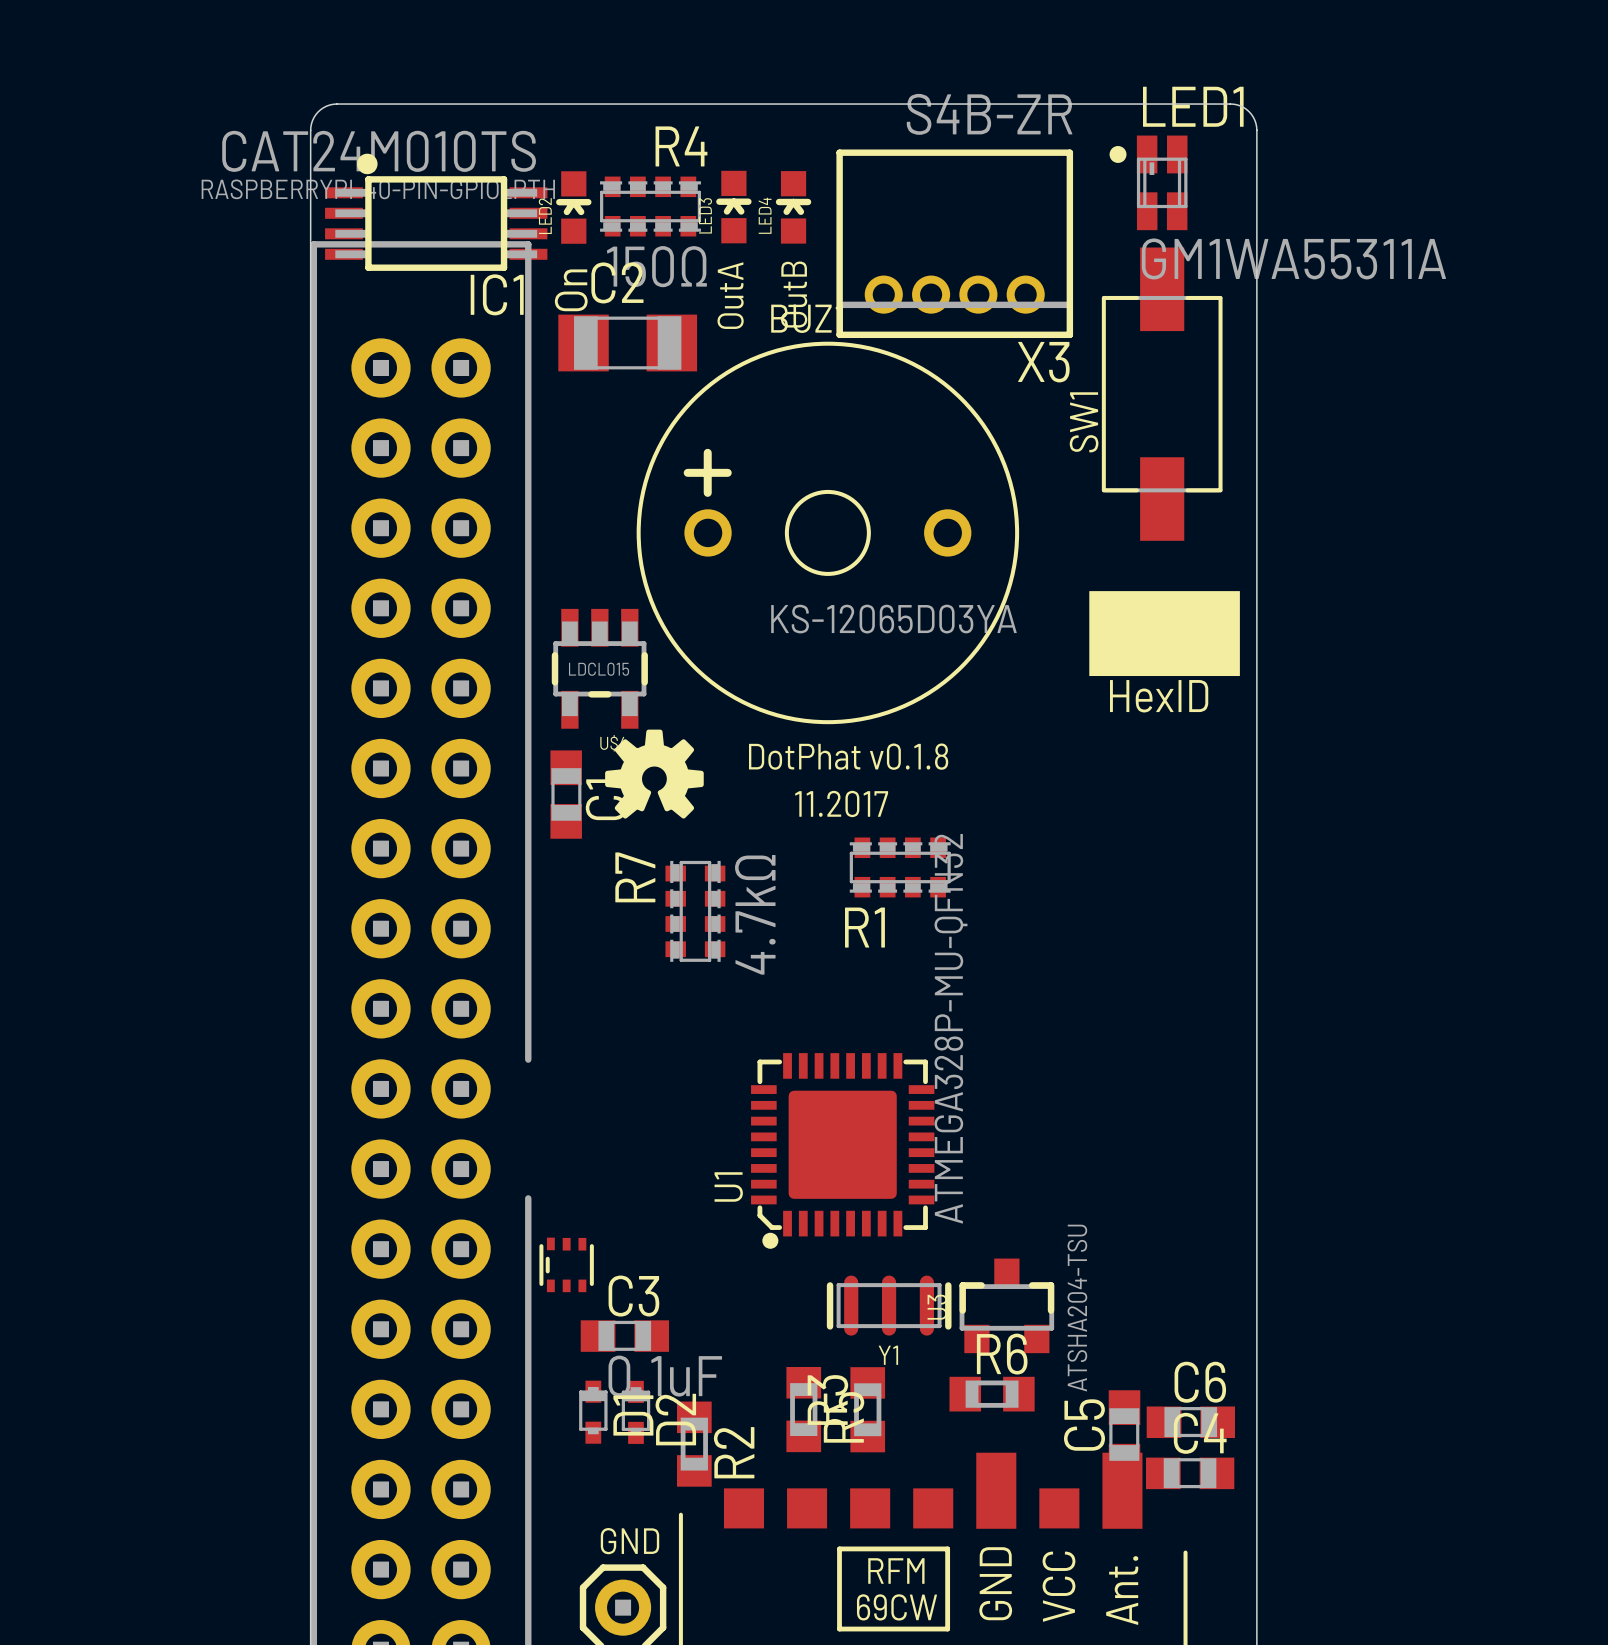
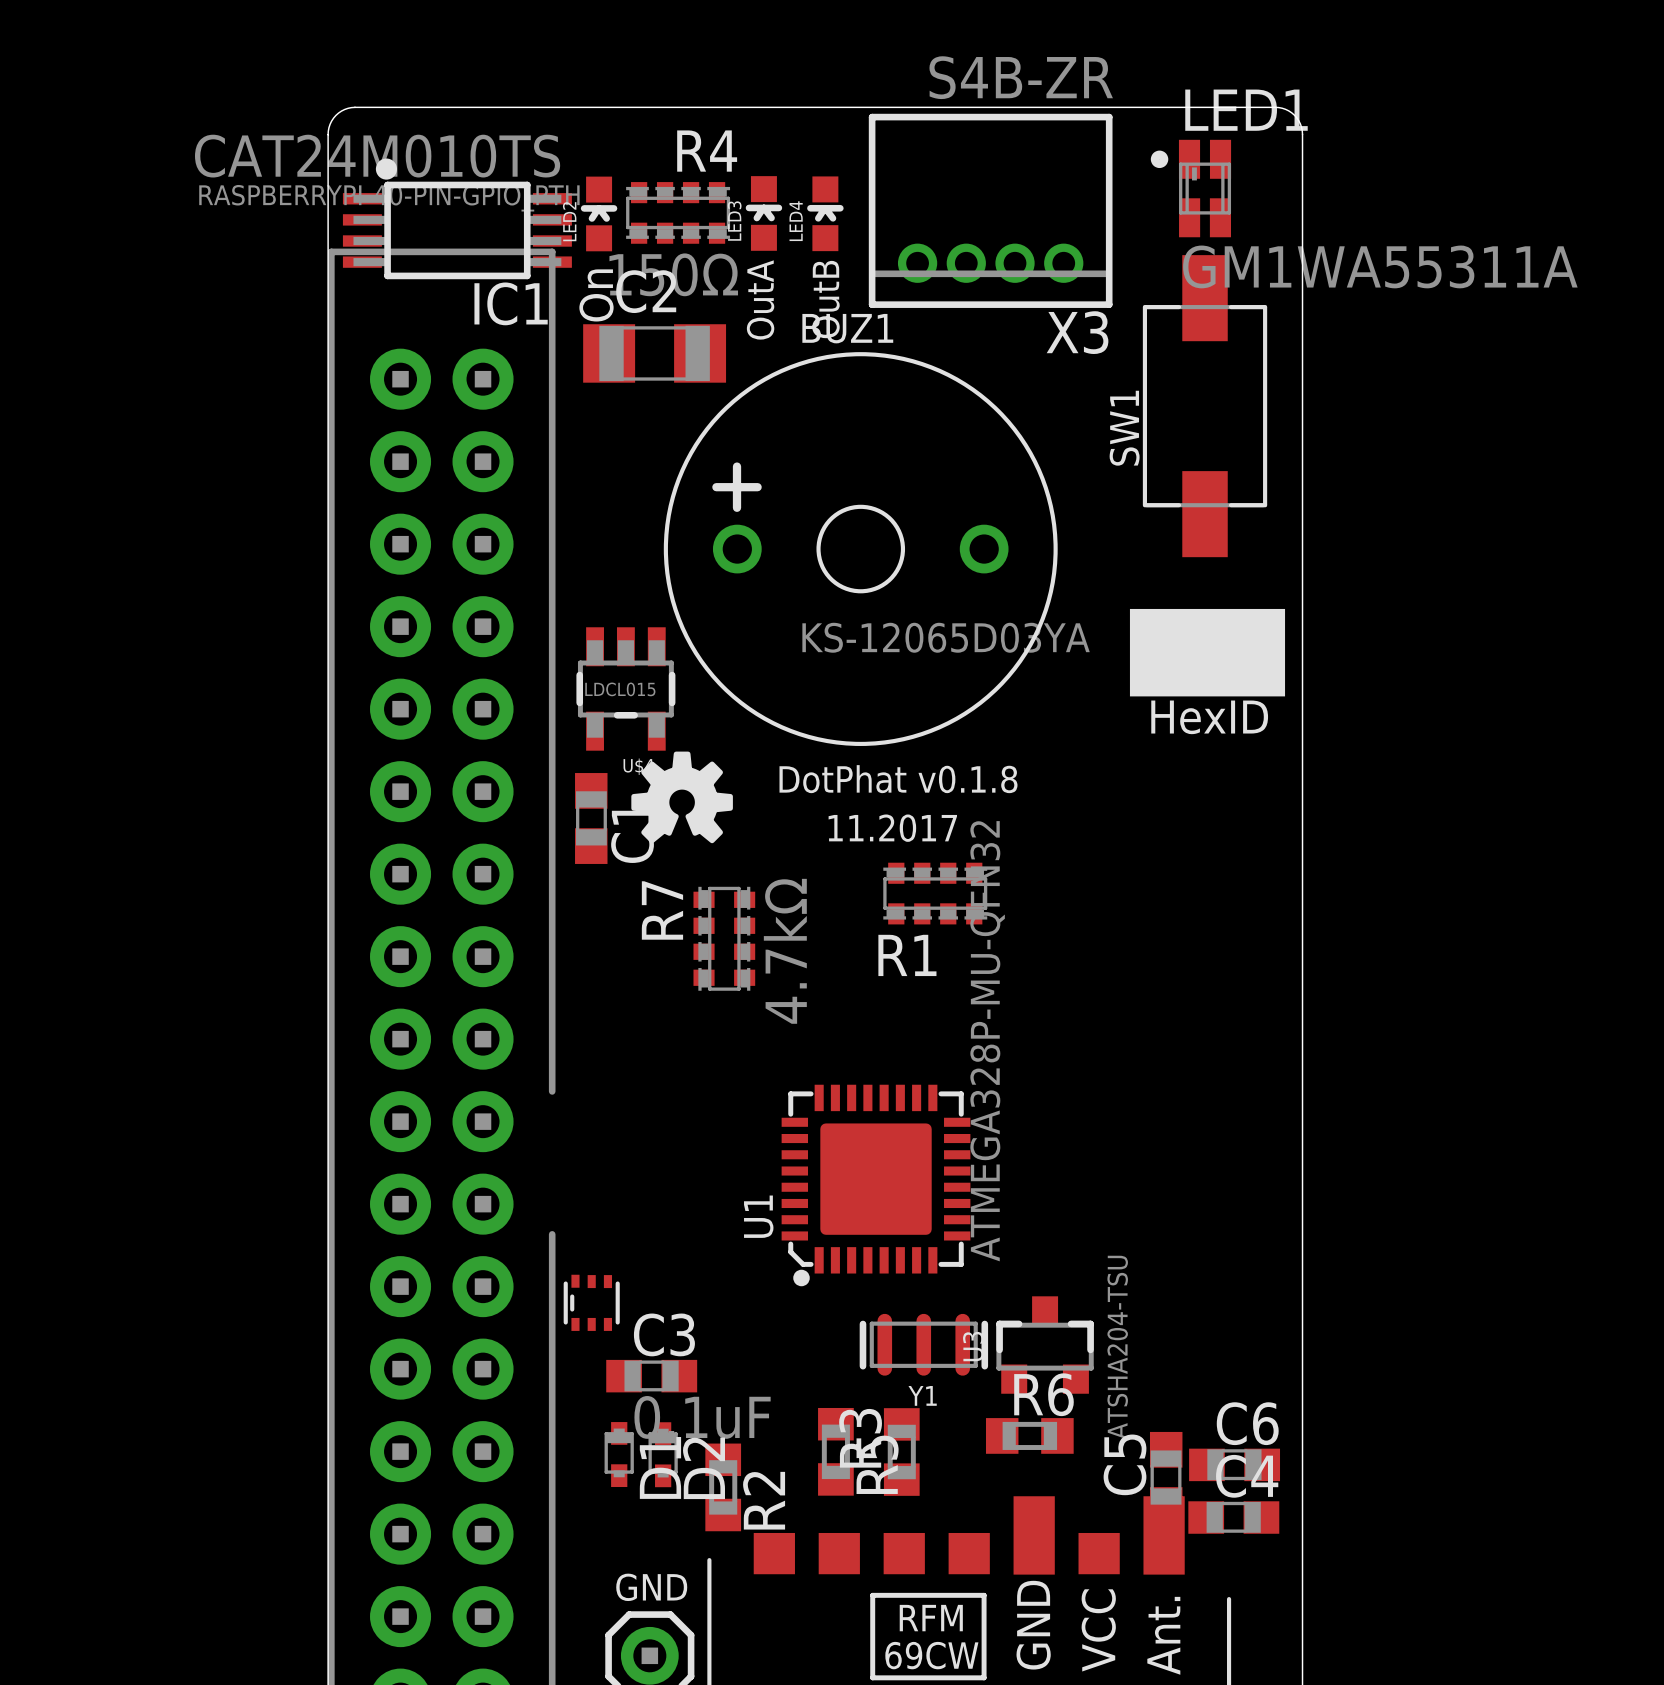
X3 position: (954, 243) -> (990, 210)

